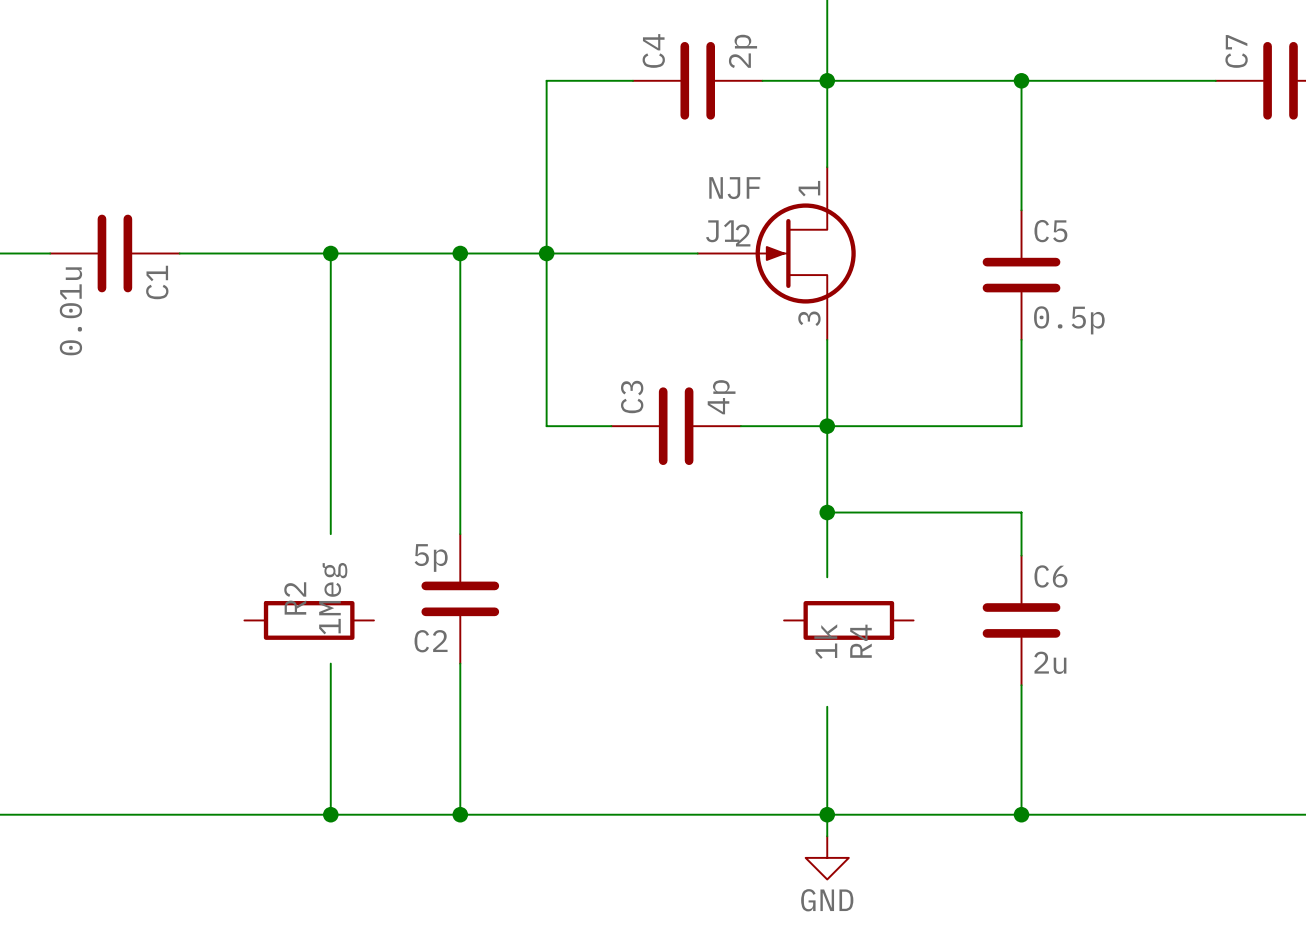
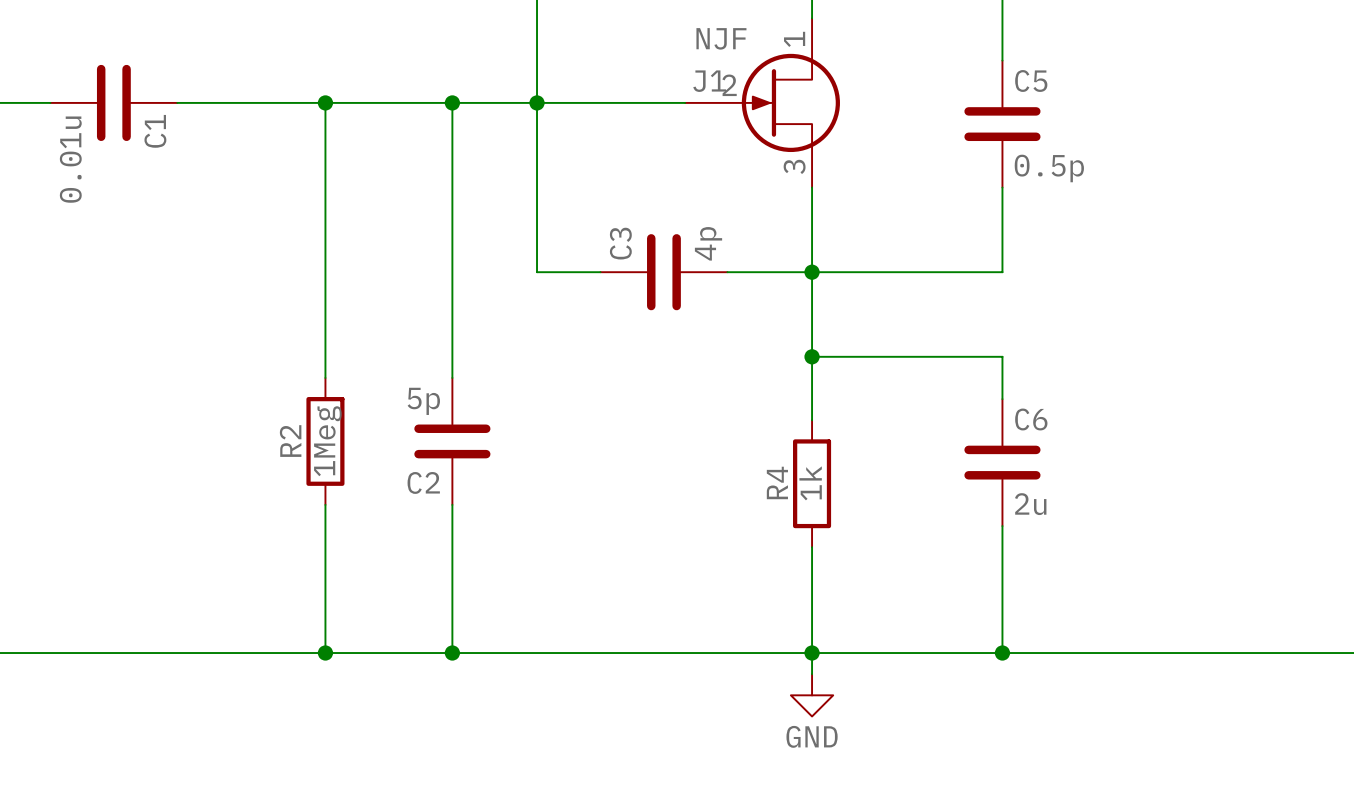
R2 rotation: 0° (309, 620) -> 90° clockwise (325, 441)
R4 rotation: 0° (848, 620) -> 90° clockwise (812, 483)

